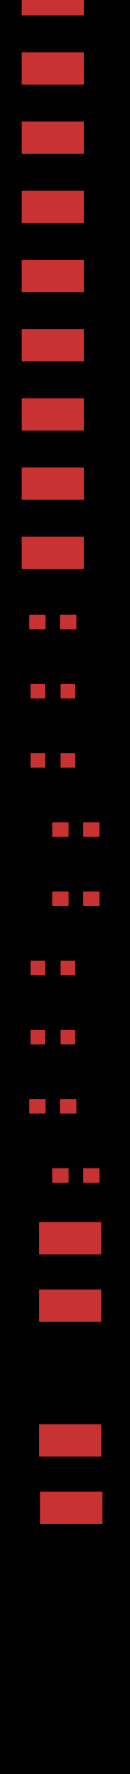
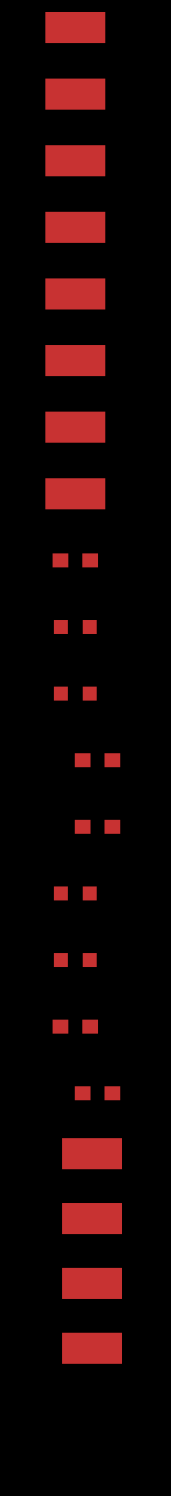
part position: (71, 1507) -> (92, 1283)

